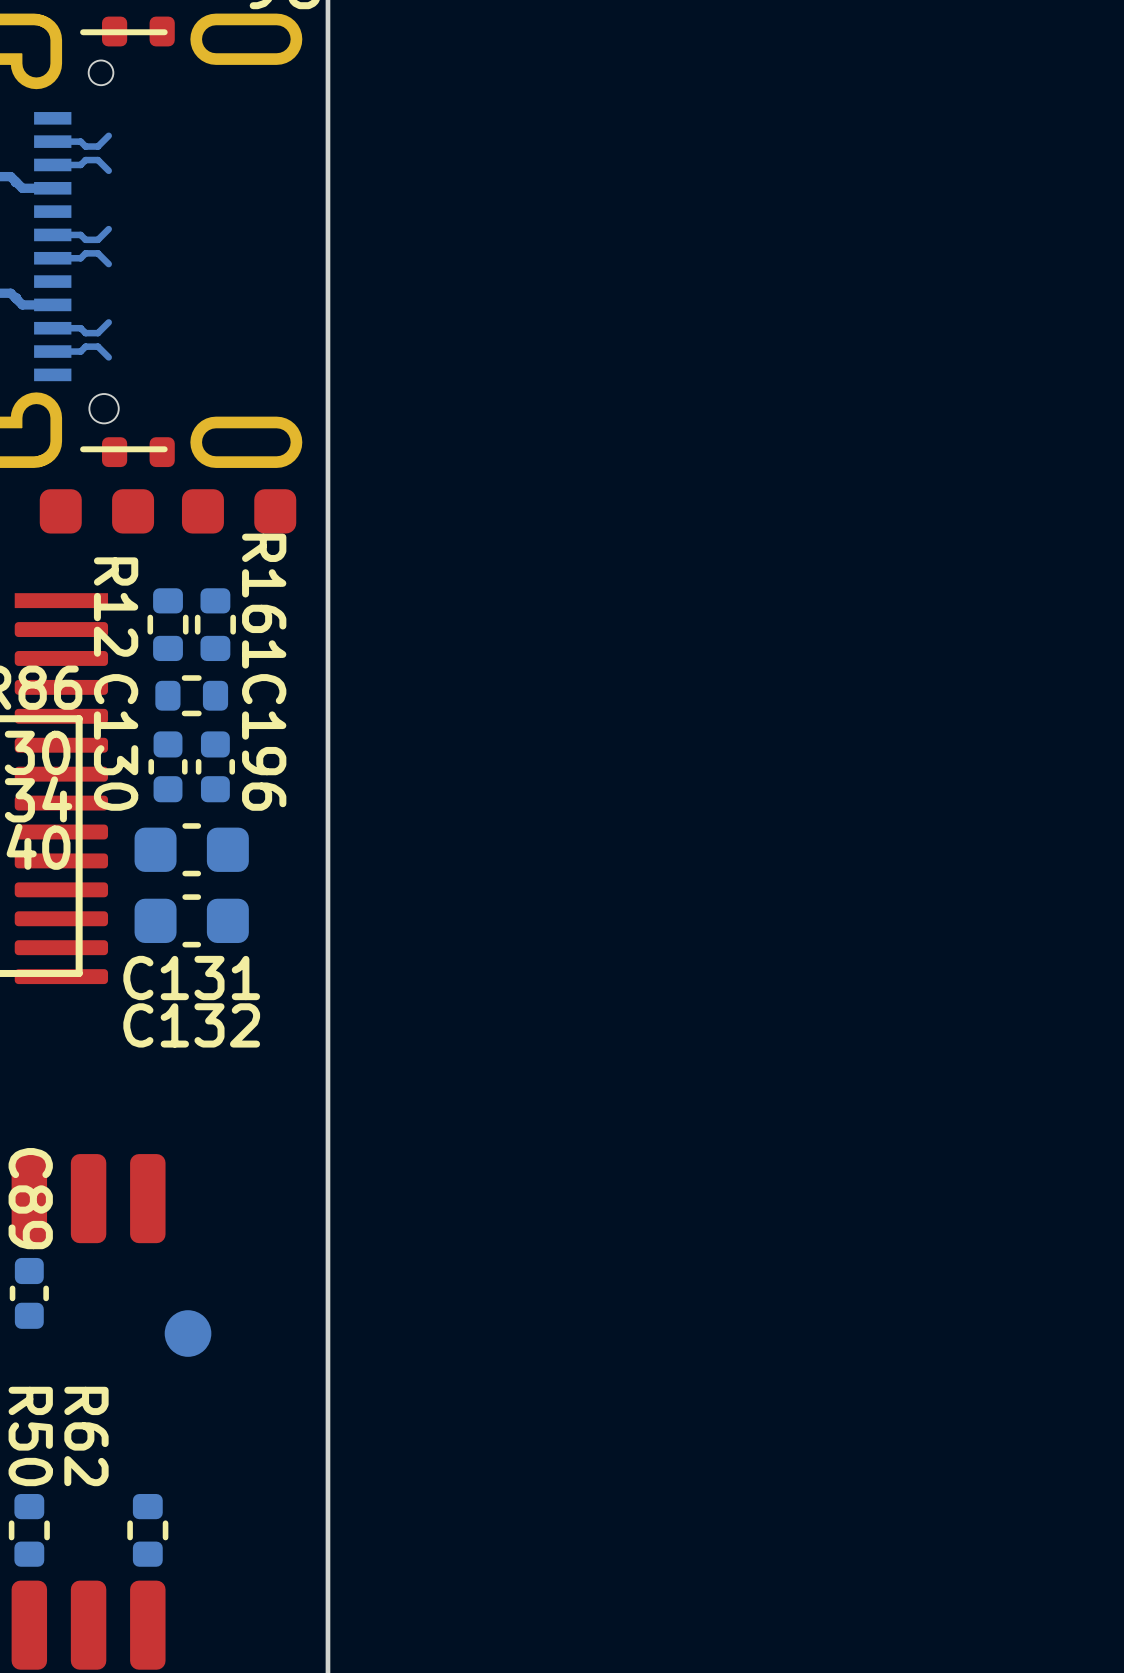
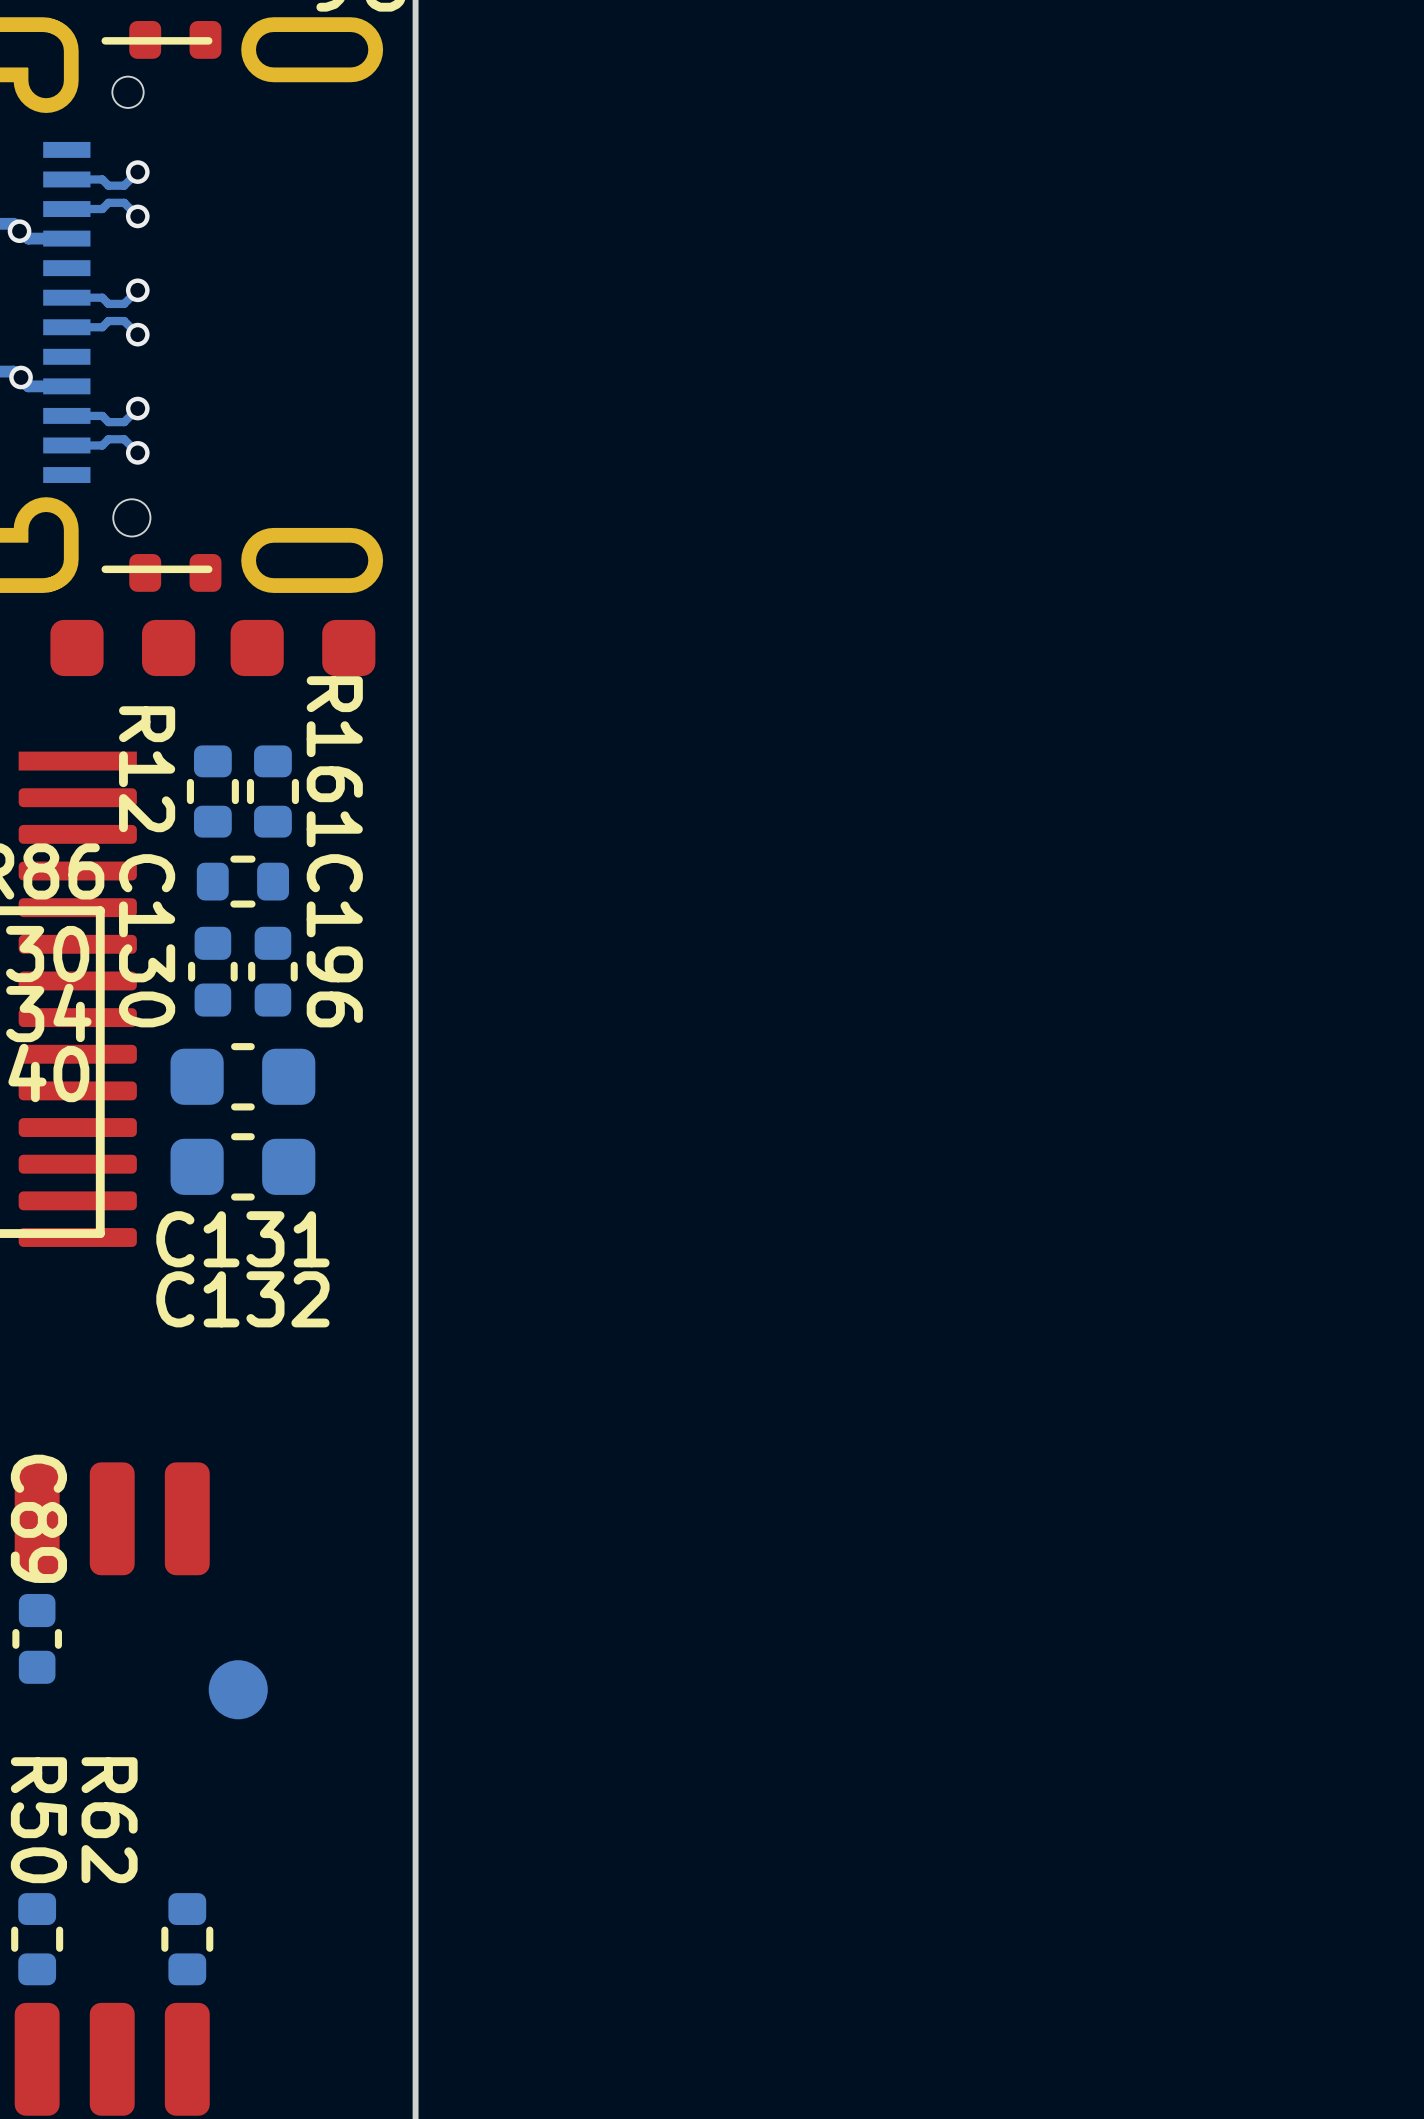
via: none -> (137, 172)
via: none -> (137, 216)
via: none -> (19, 231)
via: none -> (137, 290)
via: none -> (137, 334)
via: none -> (21, 377)
via: none -> (137, 408)
via: none -> (137, 452)

